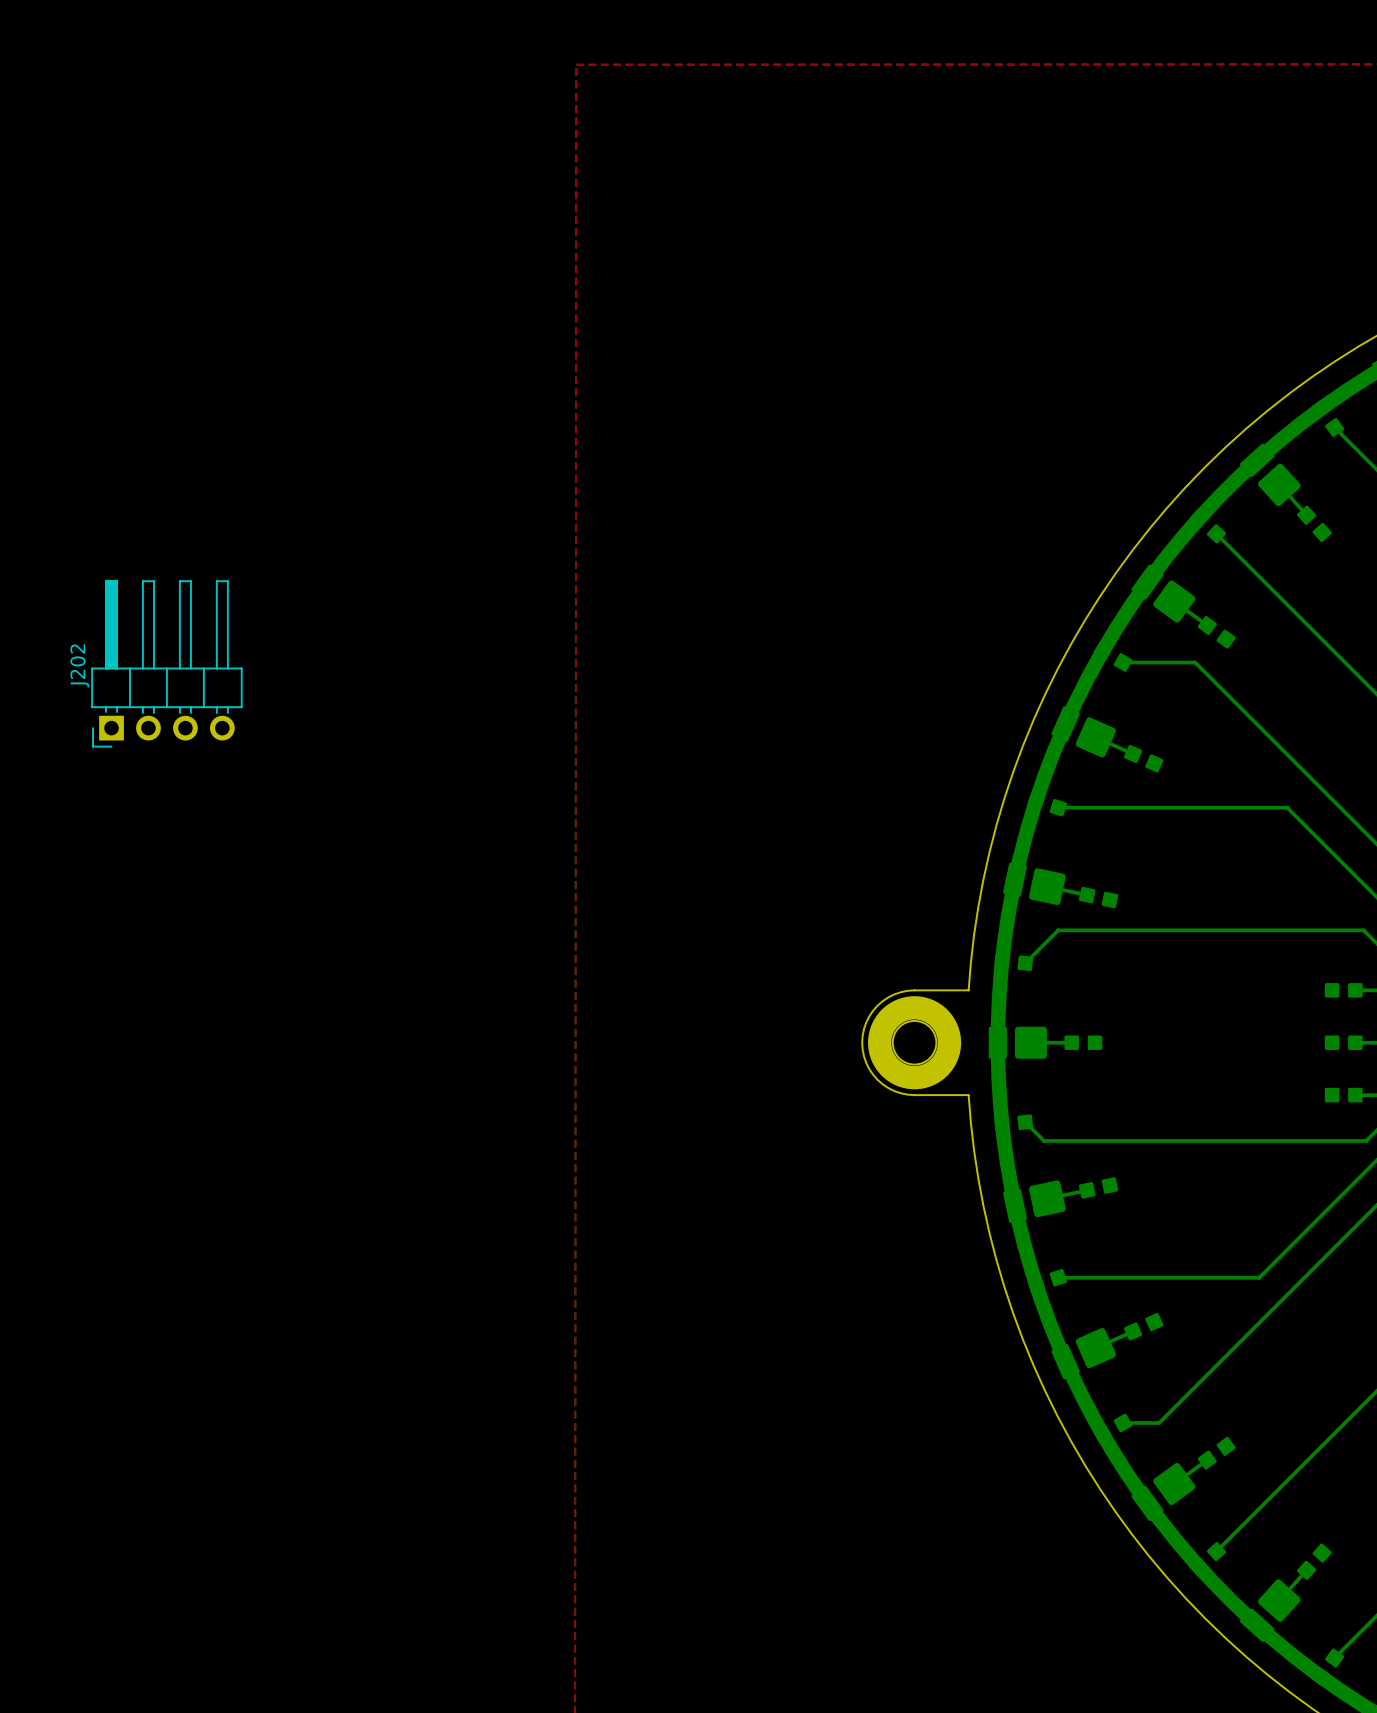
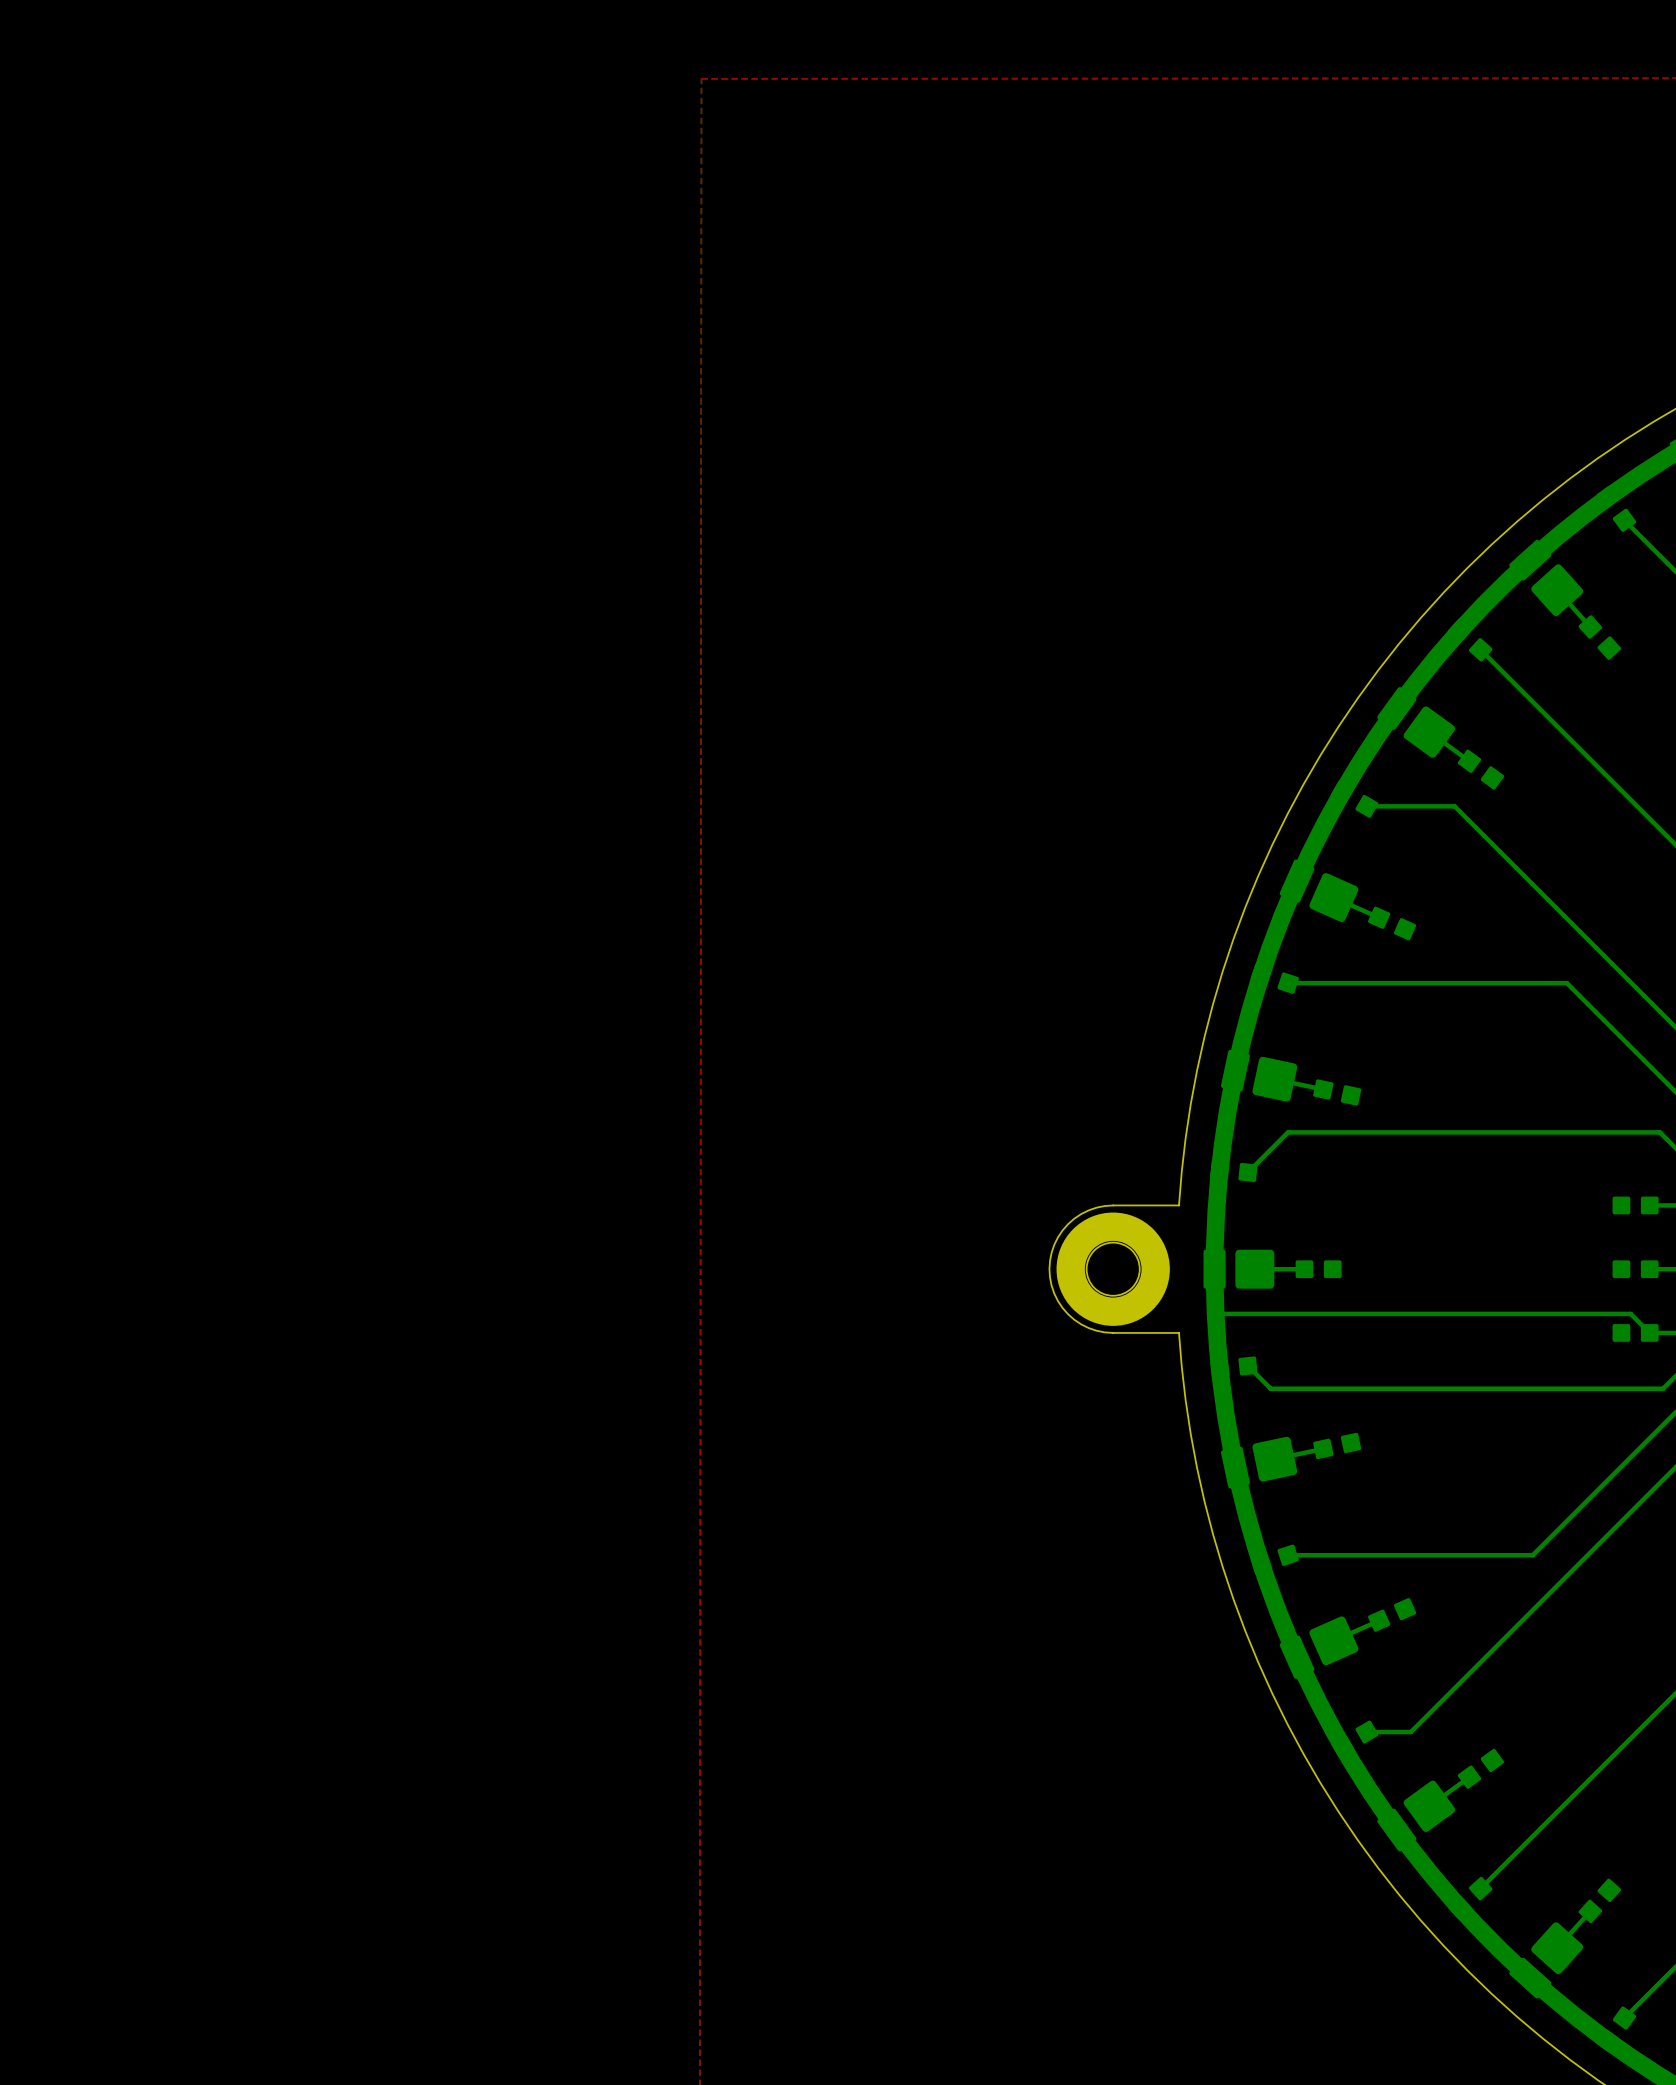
J202: (166, 663) -> none
bottom track: none -> (1224, 1313) (1630, 1313) (1649, 1332)

